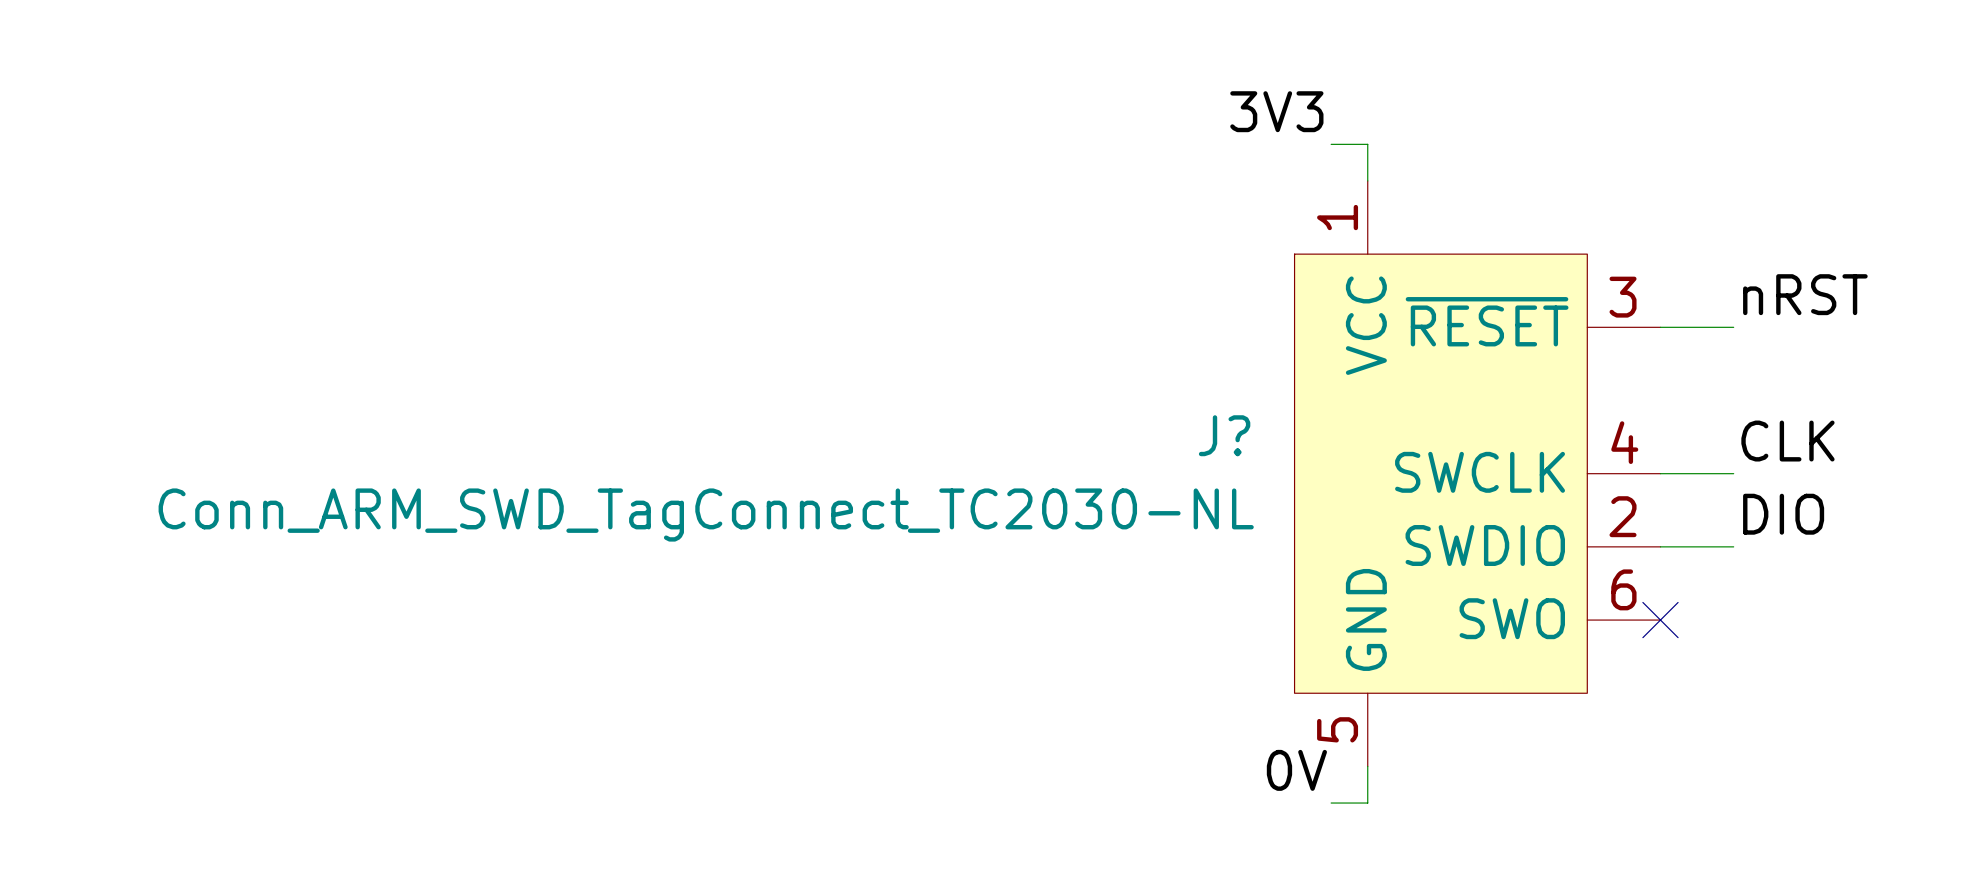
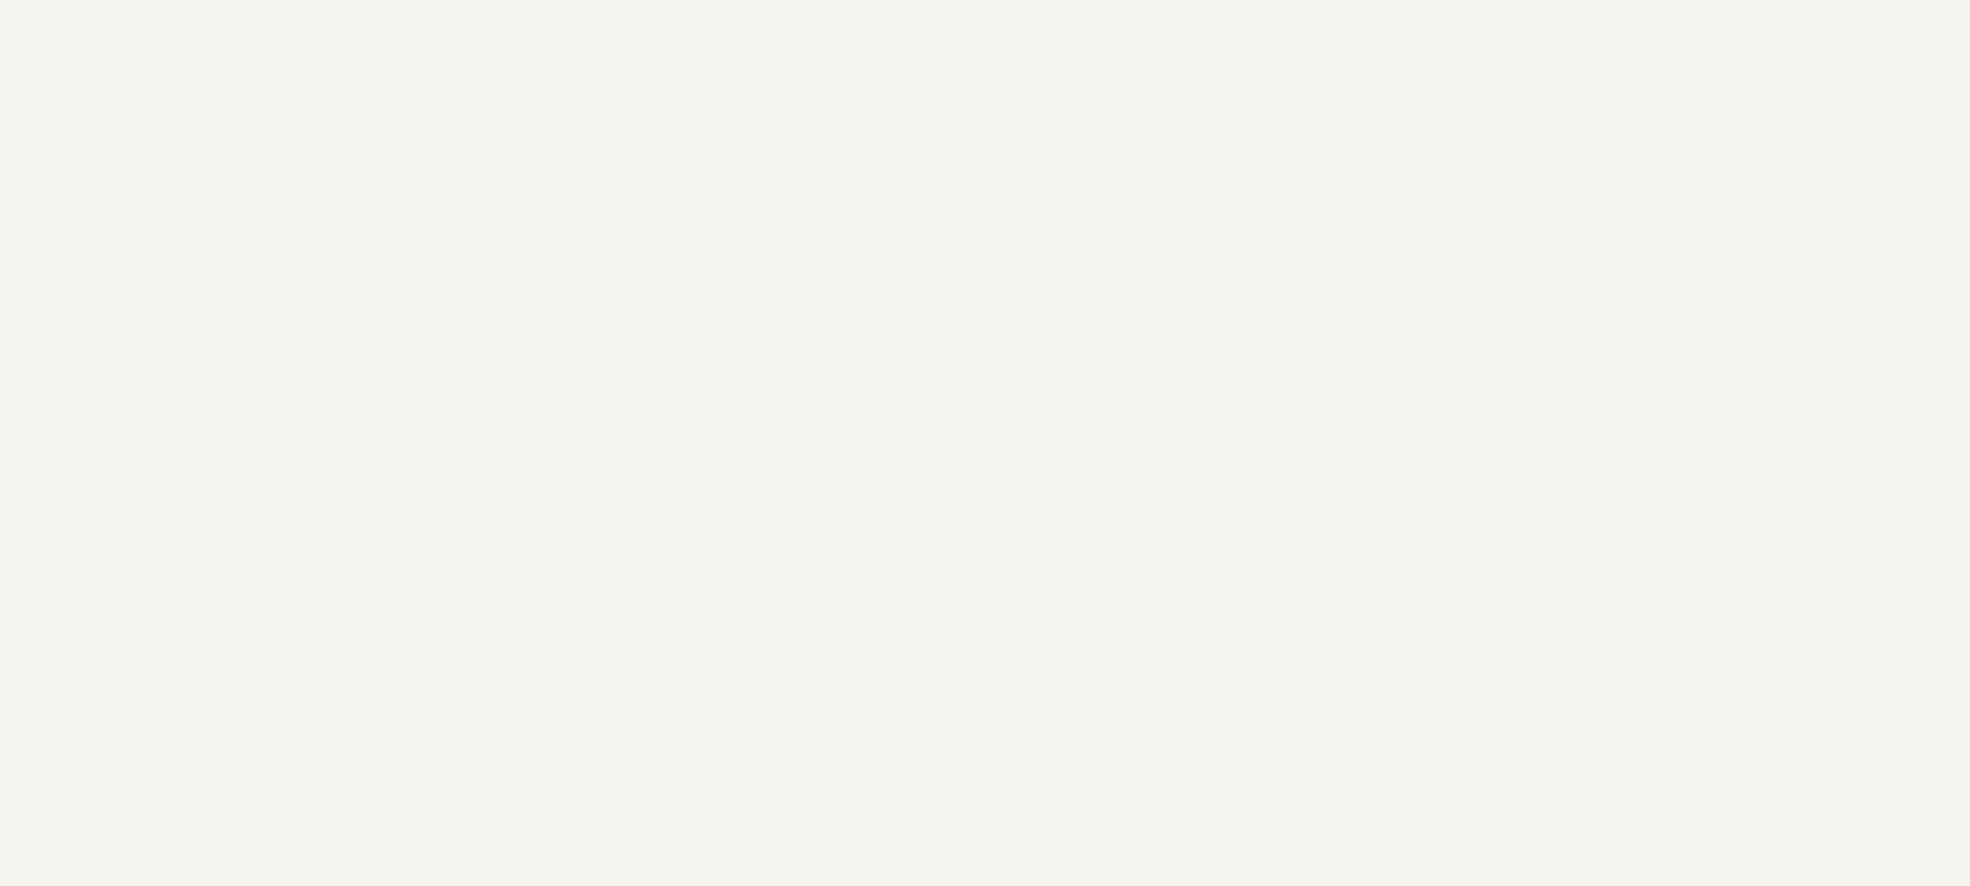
label: 3V3 (1276, 111) -> none
wire: (1331, 144) (1367, 144) (1367, 180) -> none
label: nRST (1805, 294) -> none
wire: (1660, 327) (1733, 327) -> none
label: CLK (1787, 441) -> none
J?: Conn_ARM_SWD_TagConnect_TC2030-NL (1477, 473) -> none
wire: (1660, 473) (1733, 473) -> none
label: DIO (1783, 514) -> none
wire: (1660, 546) (1733, 546) -> none
no-connect mark: (1660, 620) -> none
wire: (1367, 766) (1367, 803) (1331, 803) -> none
label: 0V (1296, 770) -> none

